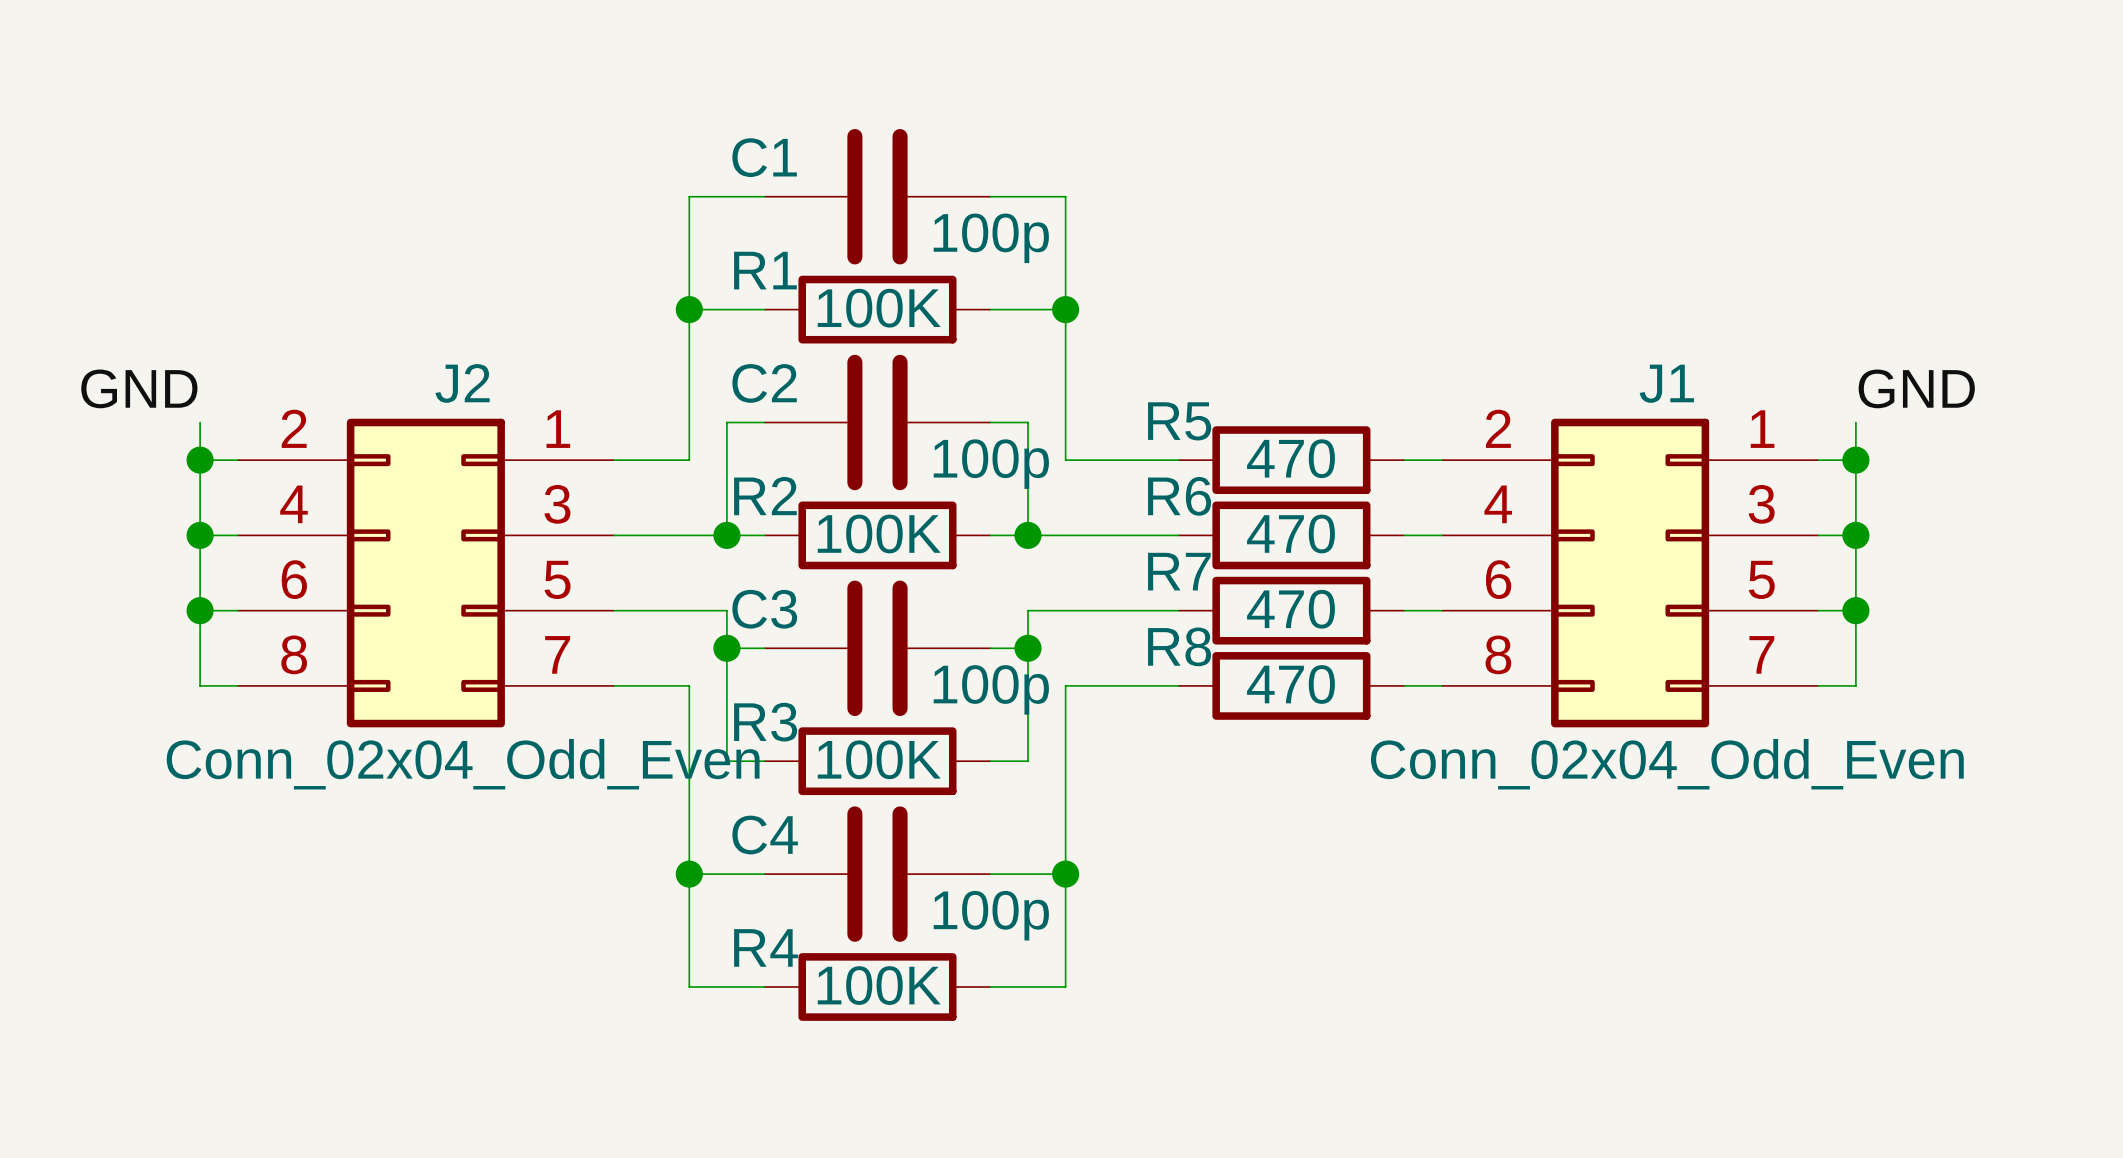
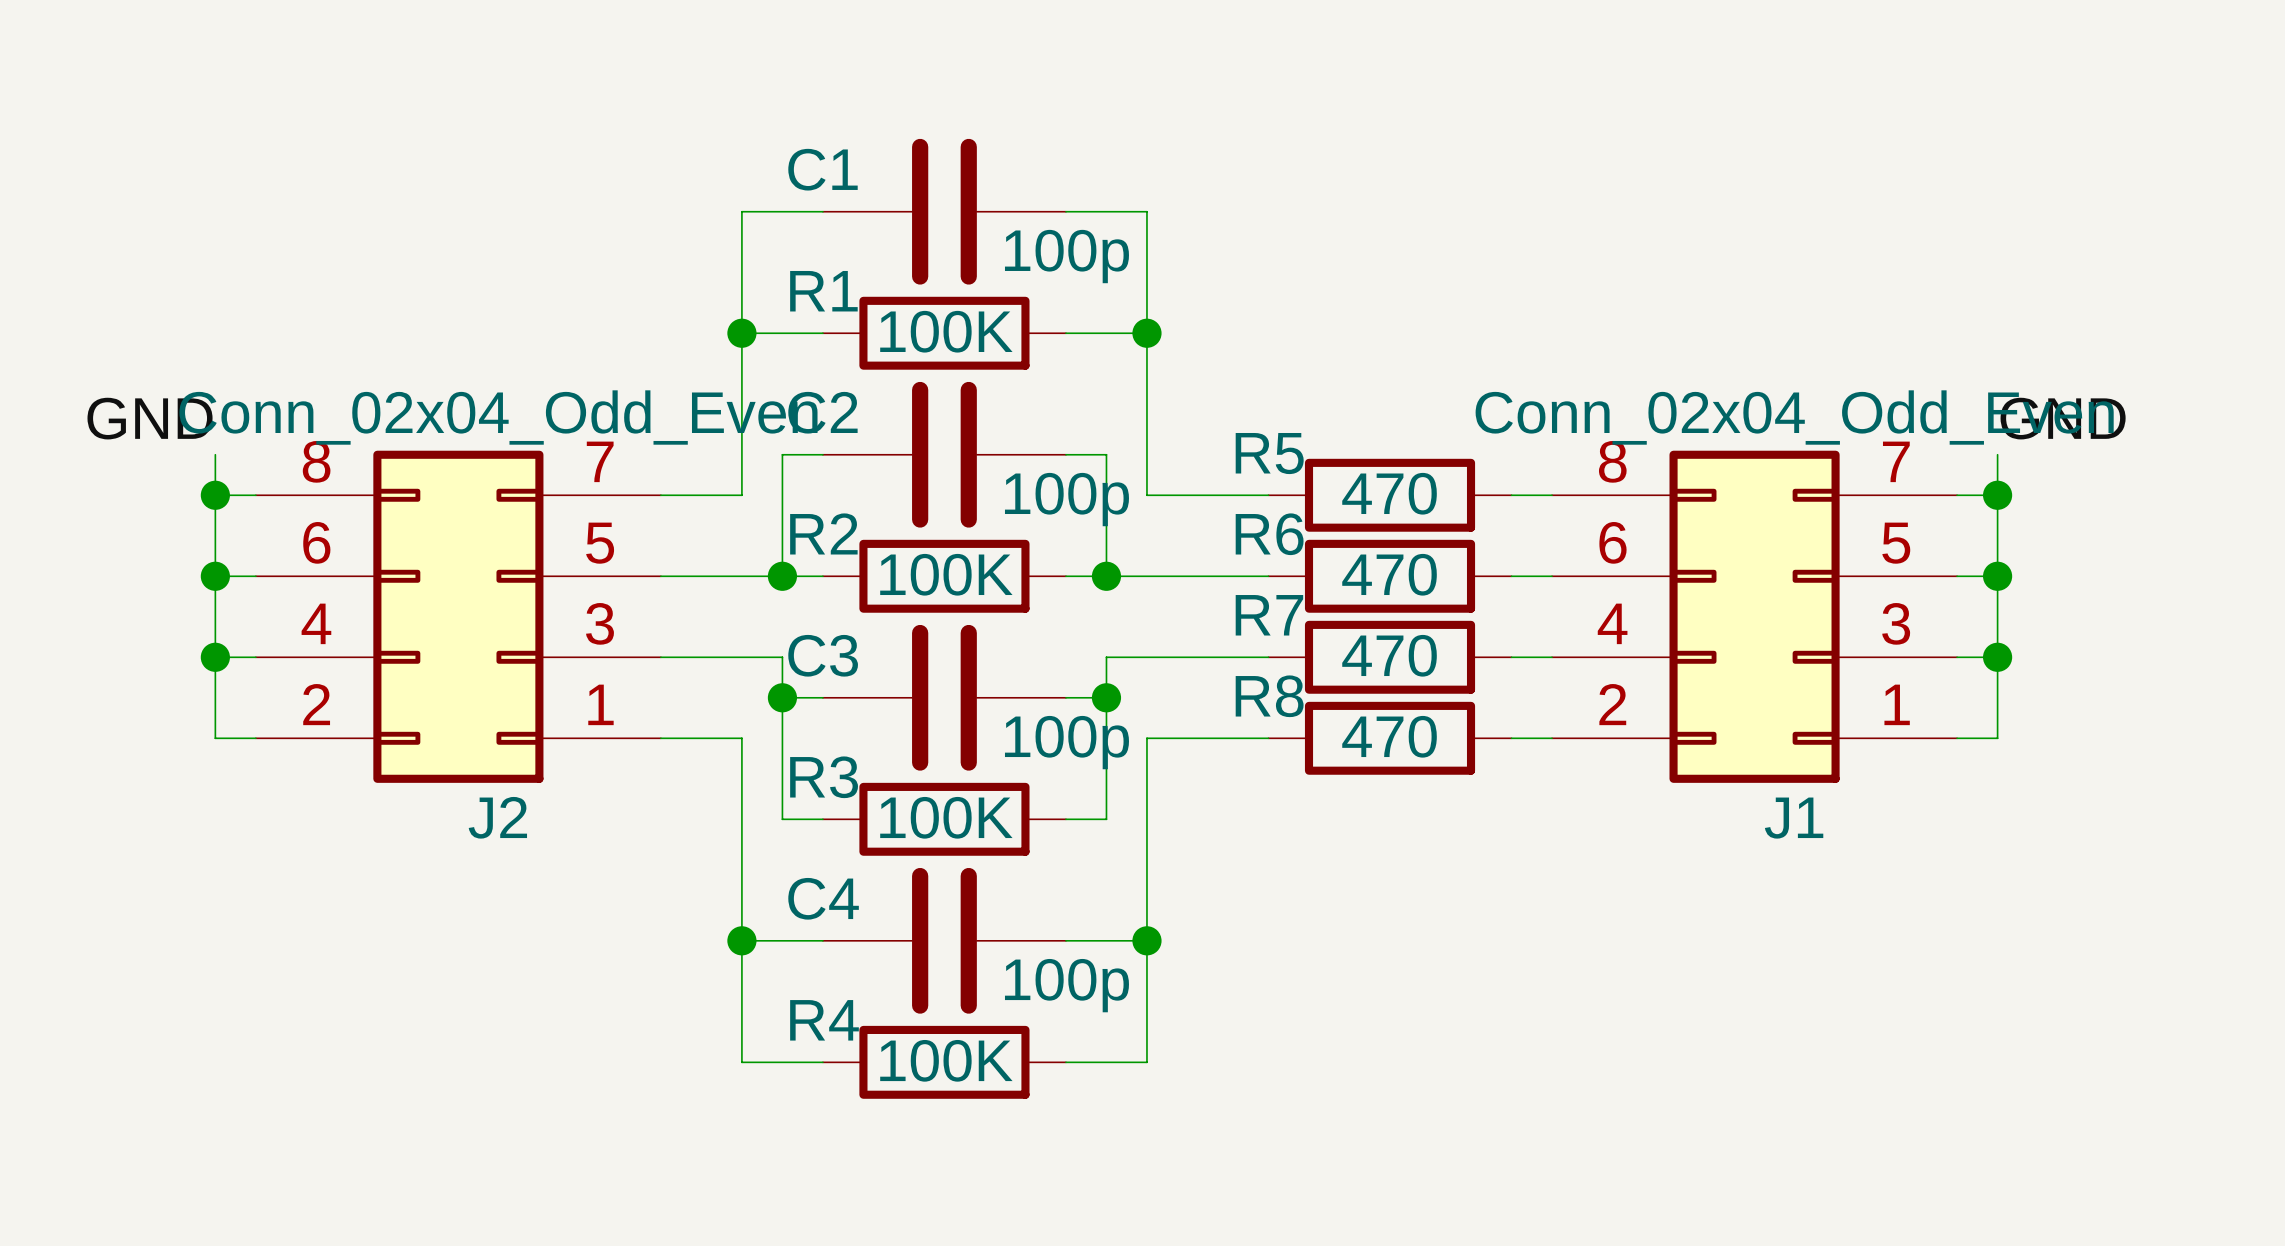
J2 flip: as is (425, 573) -> up-down (458, 616)
J1 flip: as is (1630, 573) -> up-down (1754, 616)

